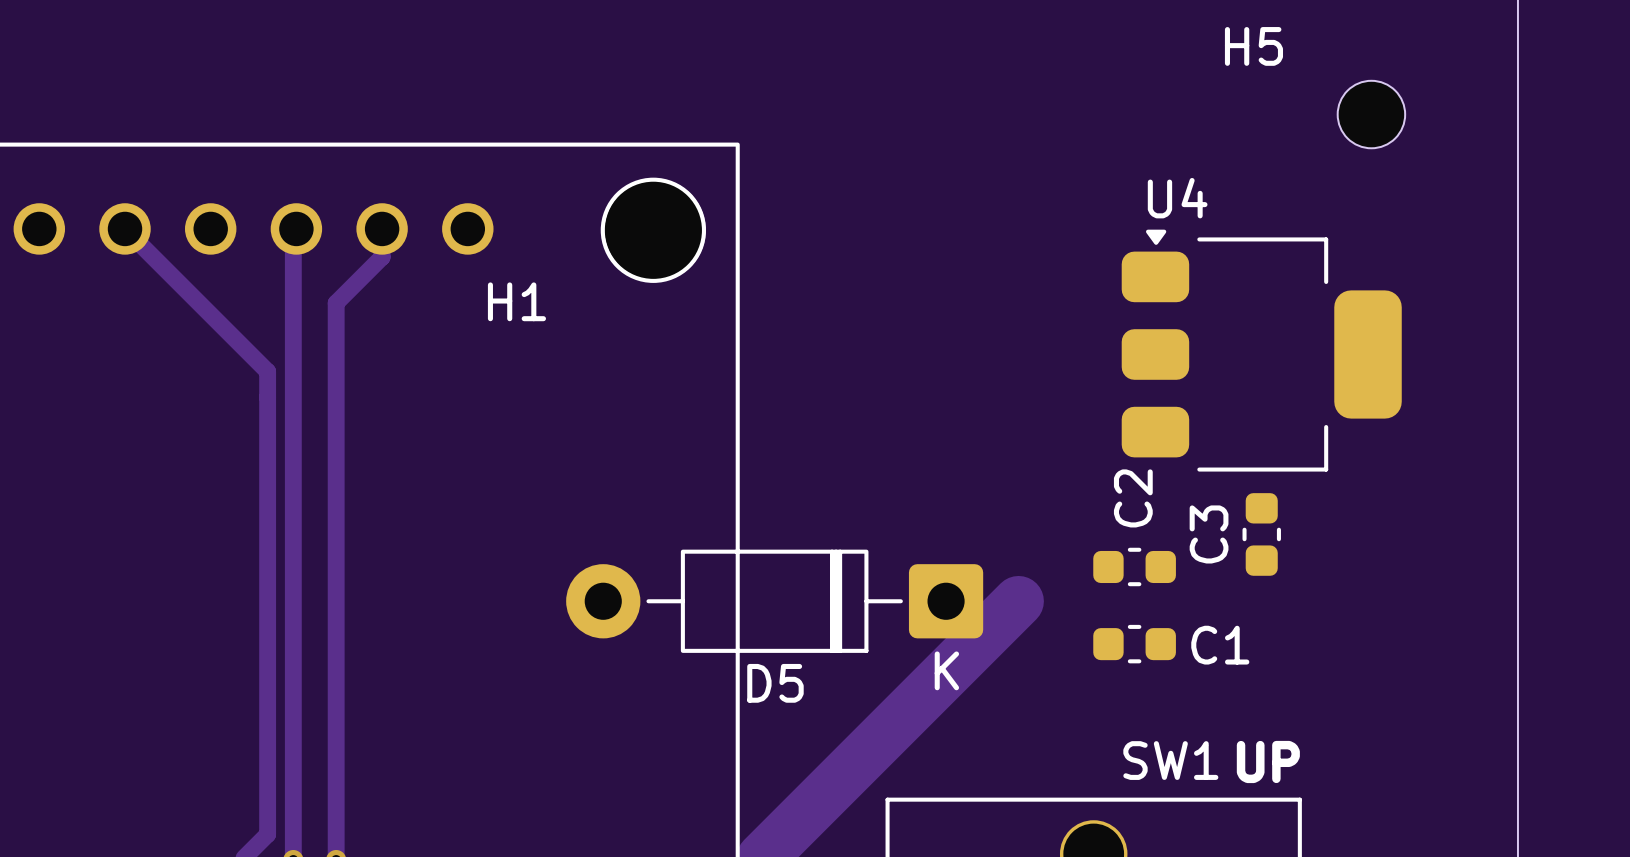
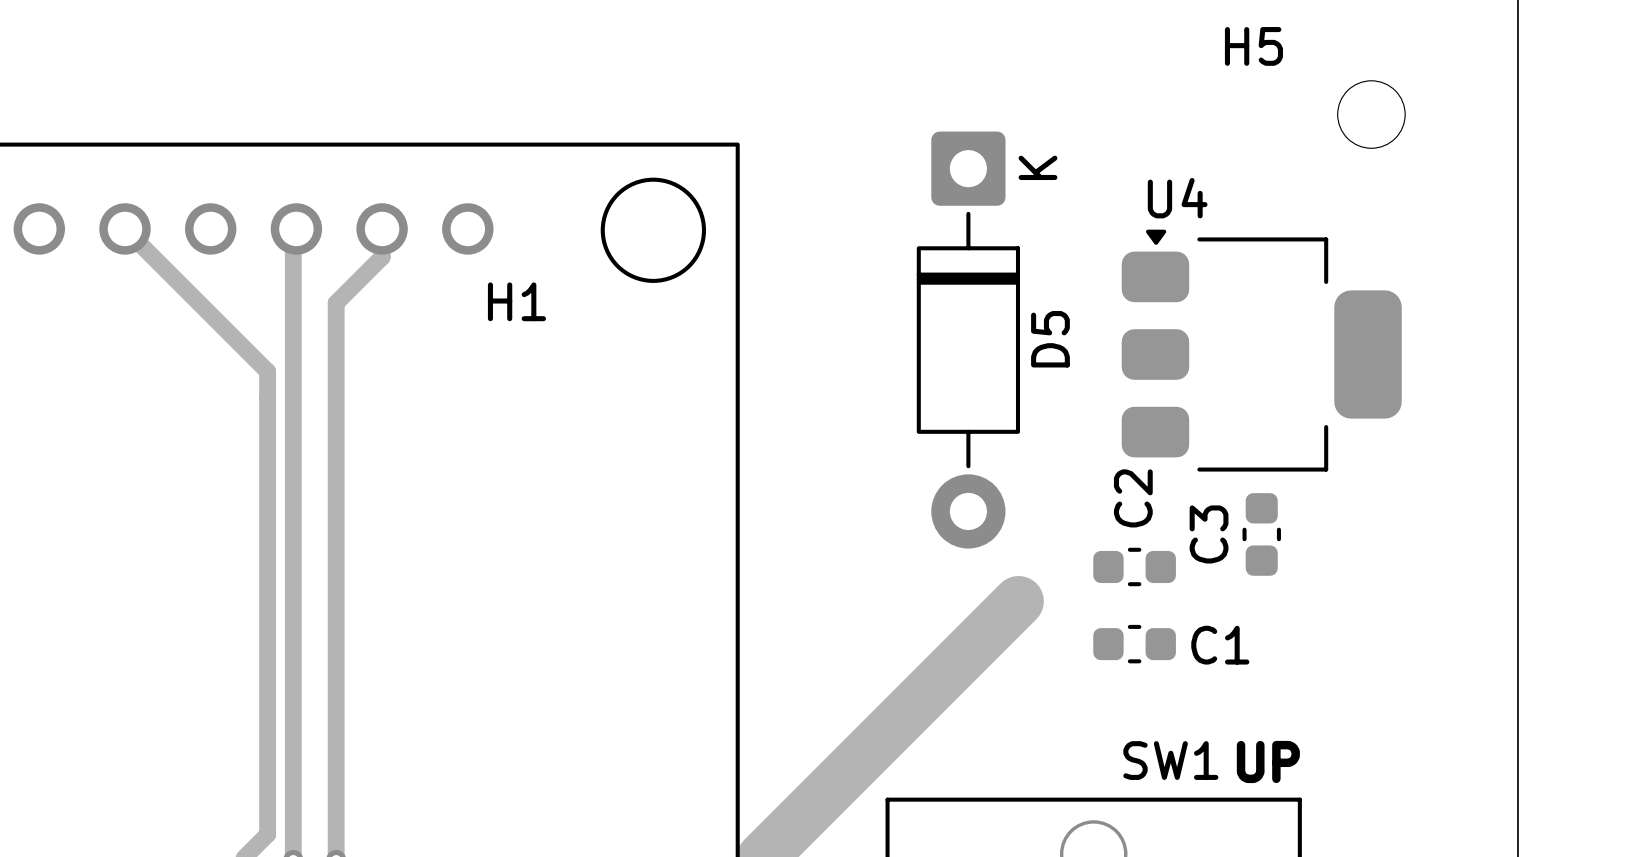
D5 rotation: 0° (774, 601) -> 90° counterclockwise (968, 340)
D5 position: (774, 601) -> (968, 340)

